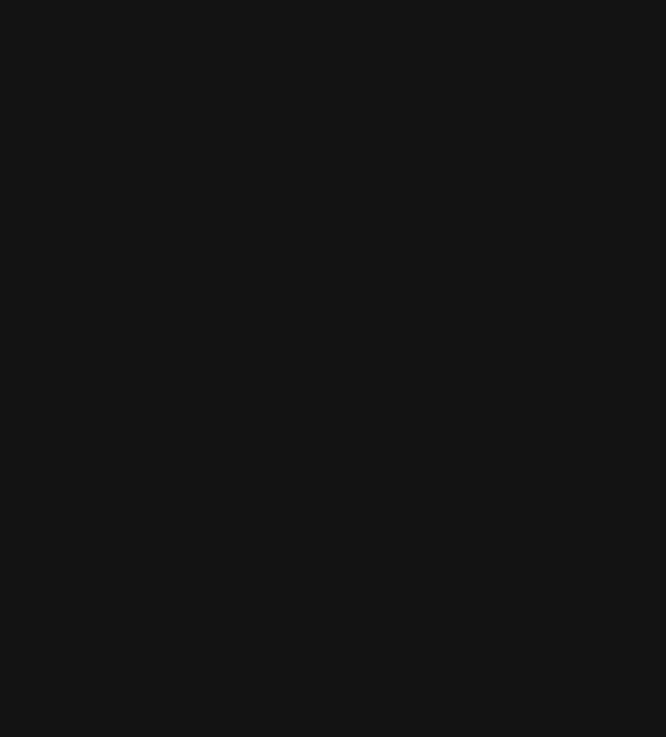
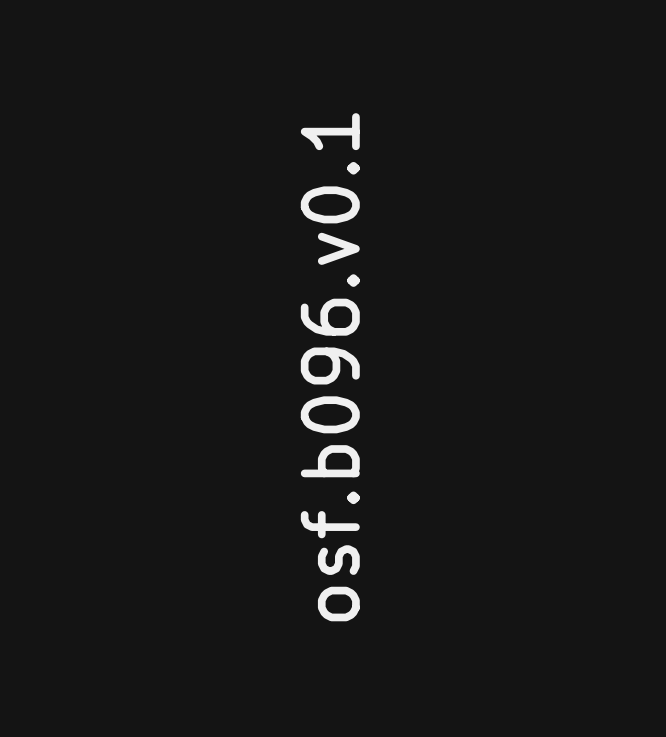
text: none -> osf.b096.v0.1 (330, 367)

